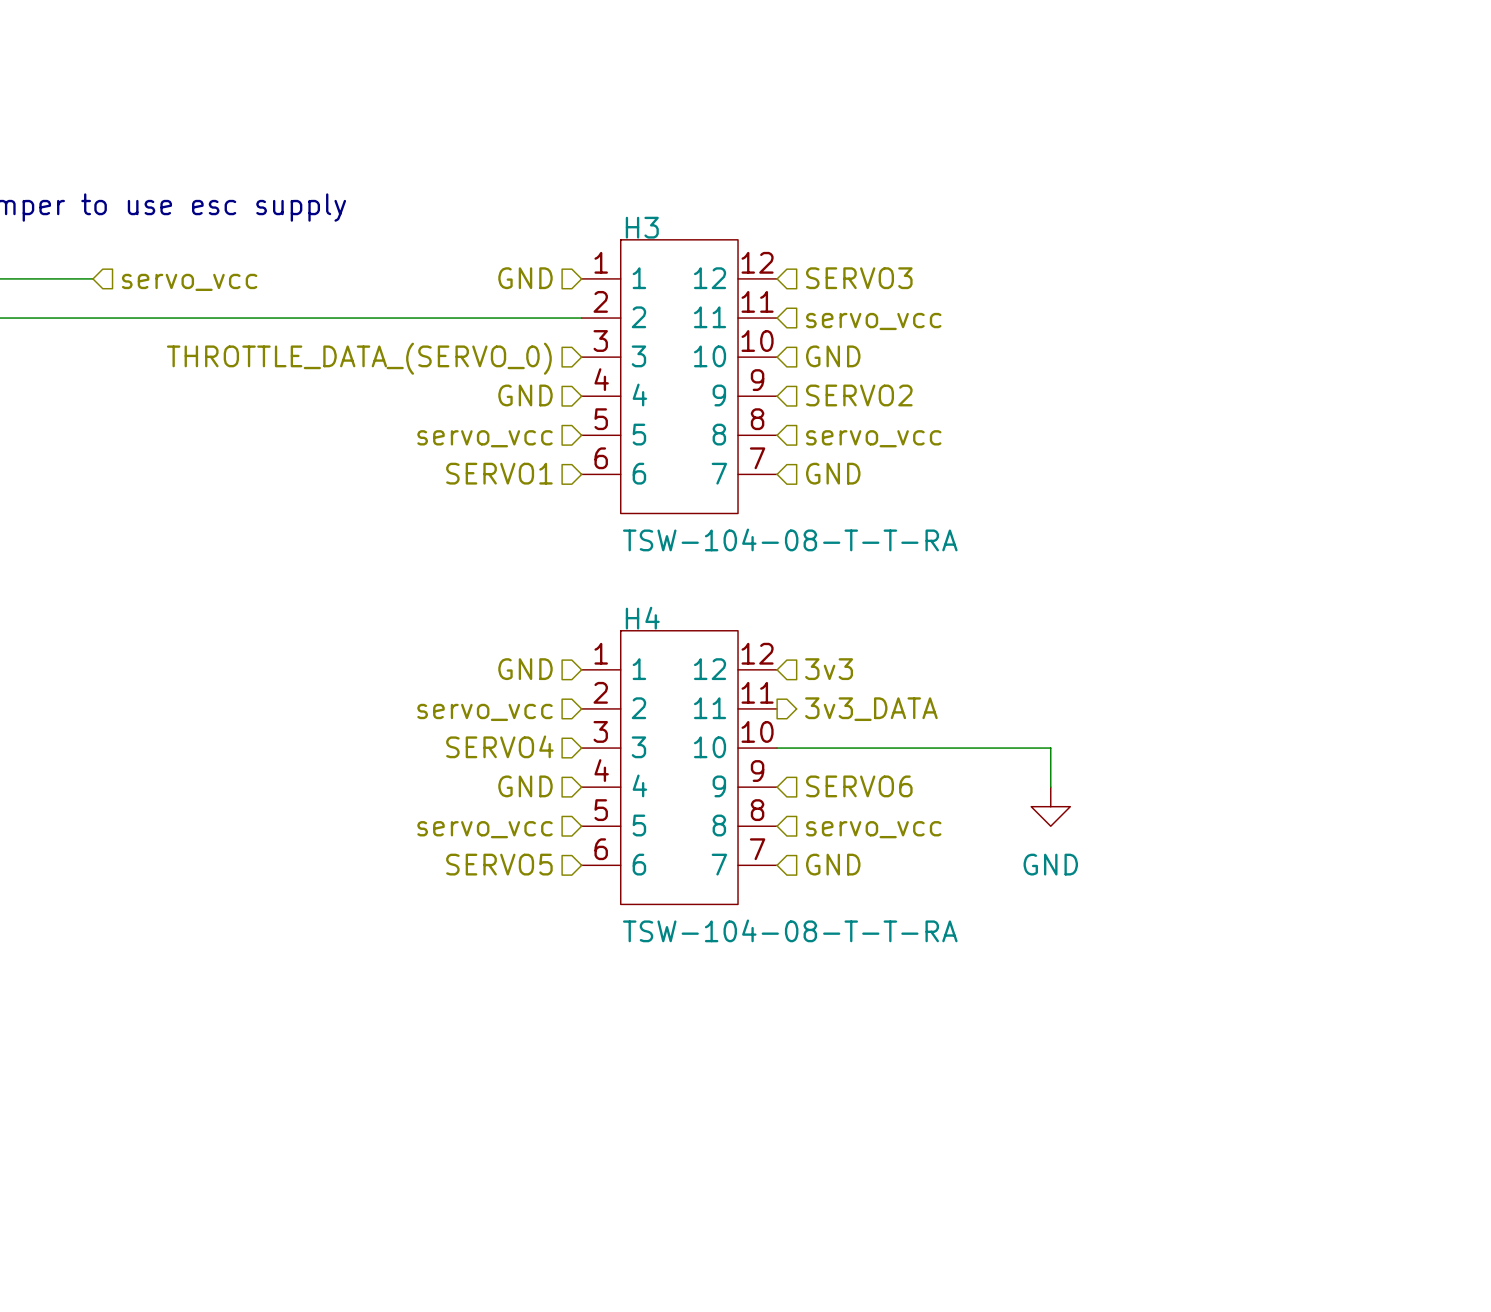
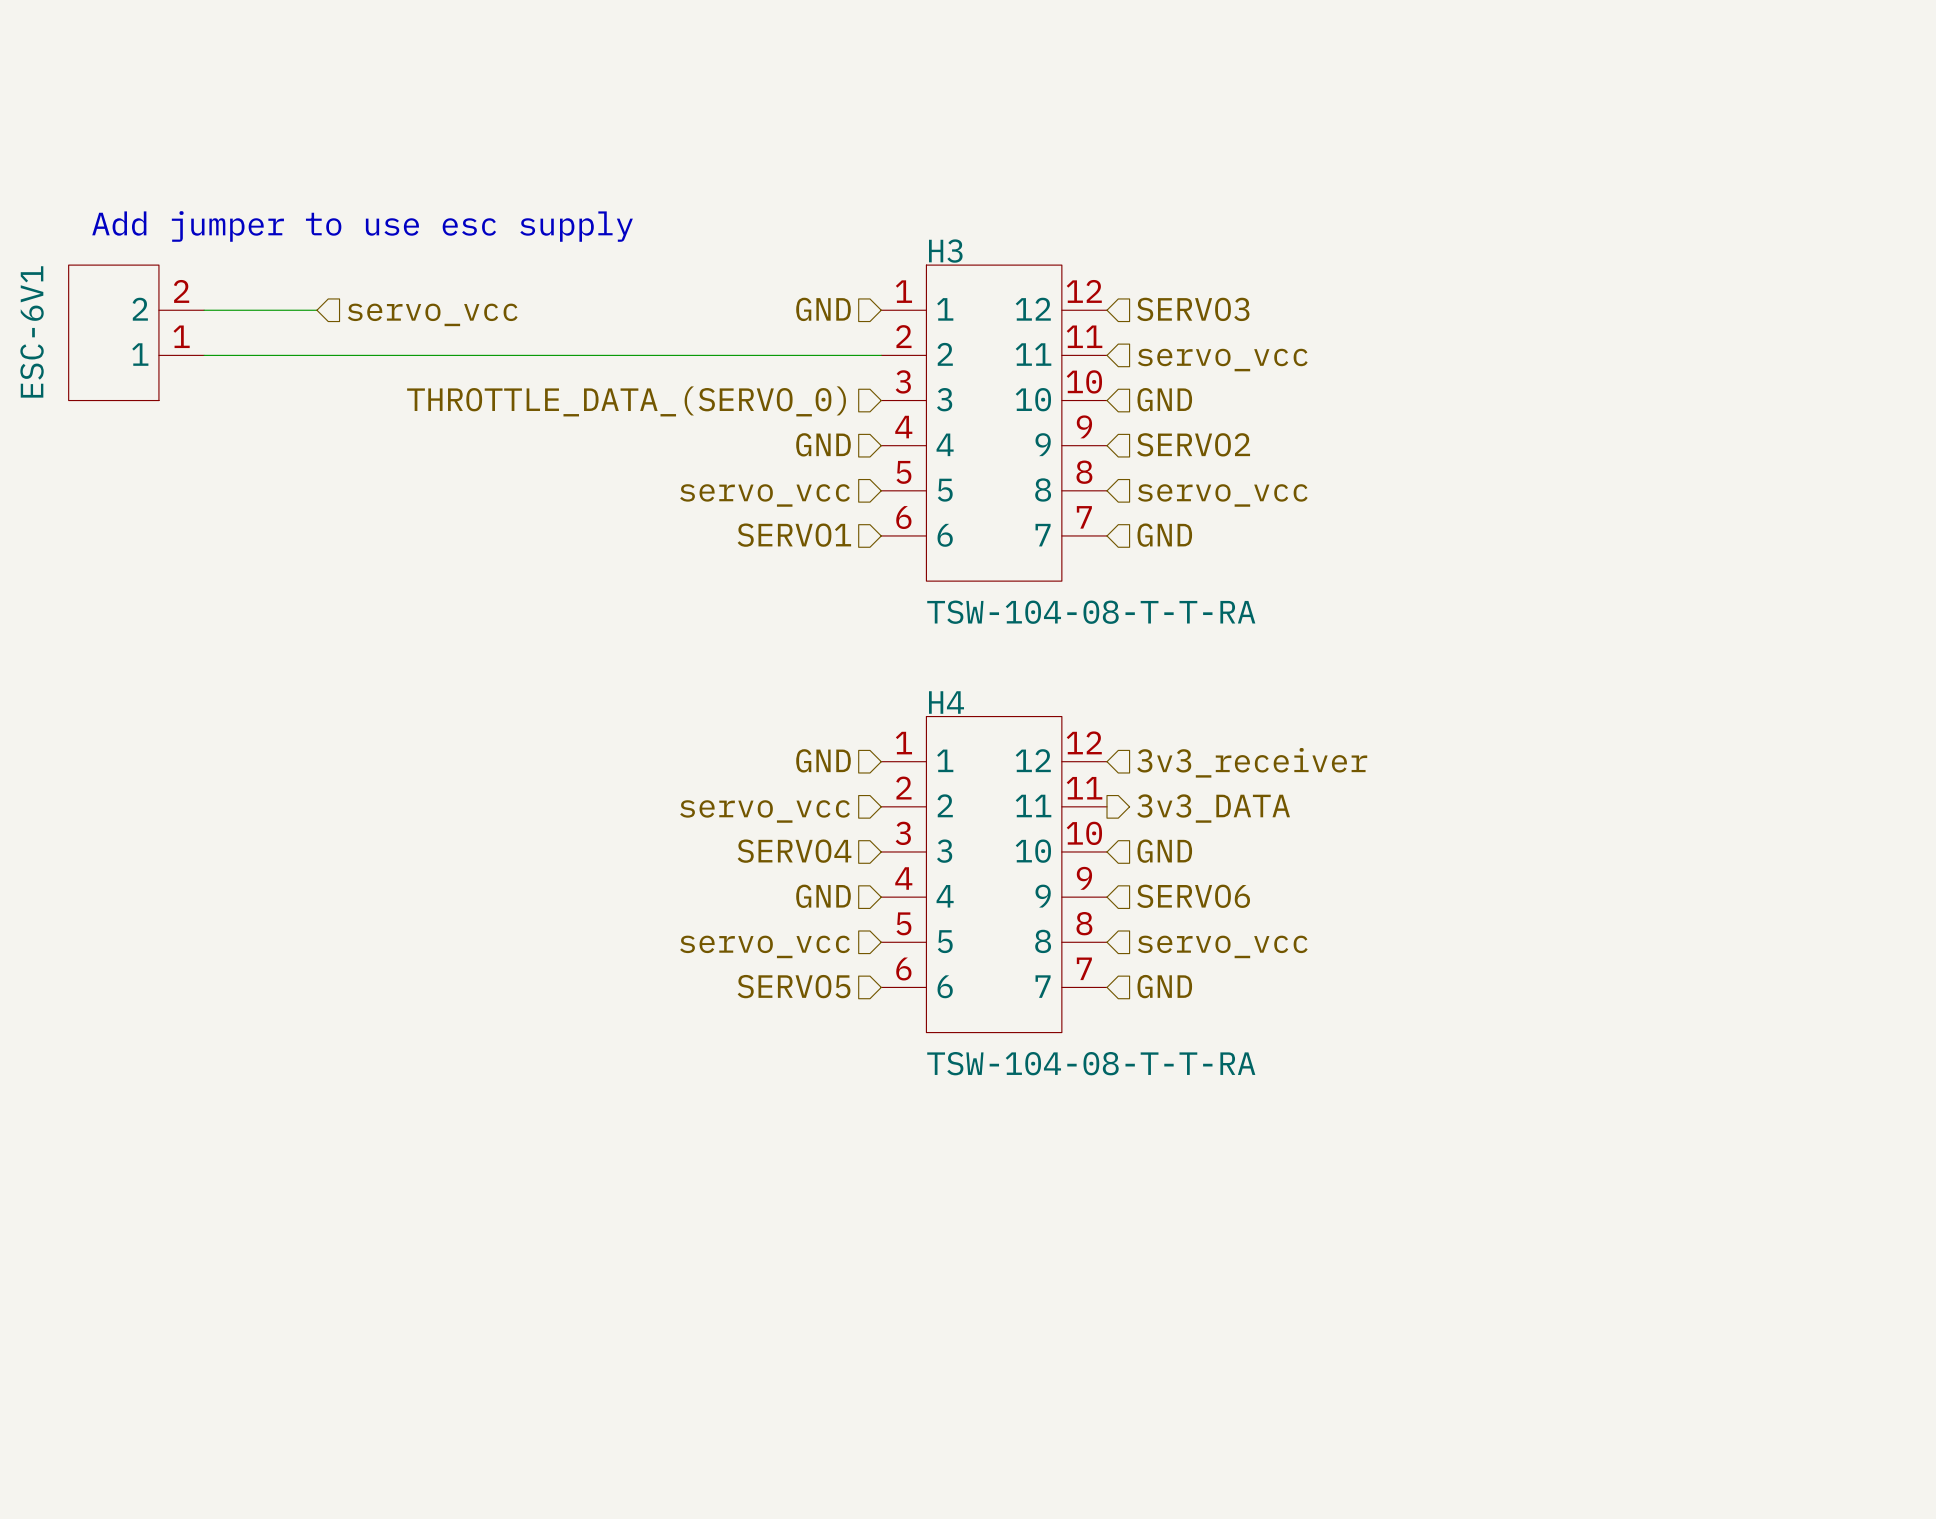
hierarchical label: 3v3 (829, 669) -> 3v3_receiver (1252, 762)
hierarchical label: none -> GND (1164, 851)
wire: (777, 748) (1050, 748) (1050, 787) -> none
power symbol: GND (1050, 806) -> none

